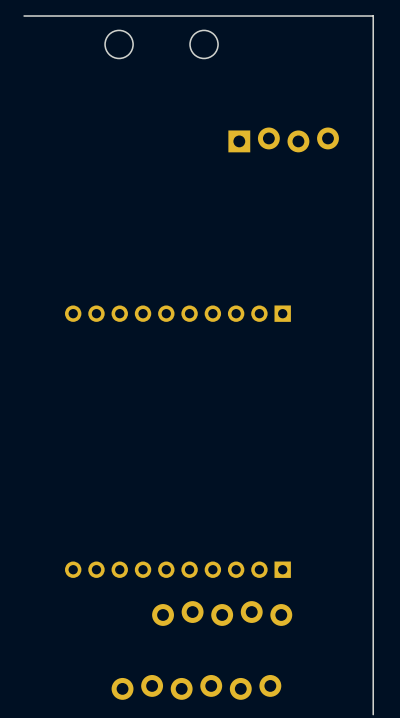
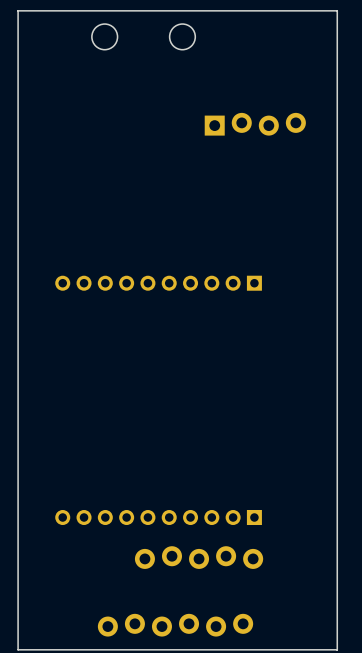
board edge: none -> (18, 10) (18, 649) (337, 649)

